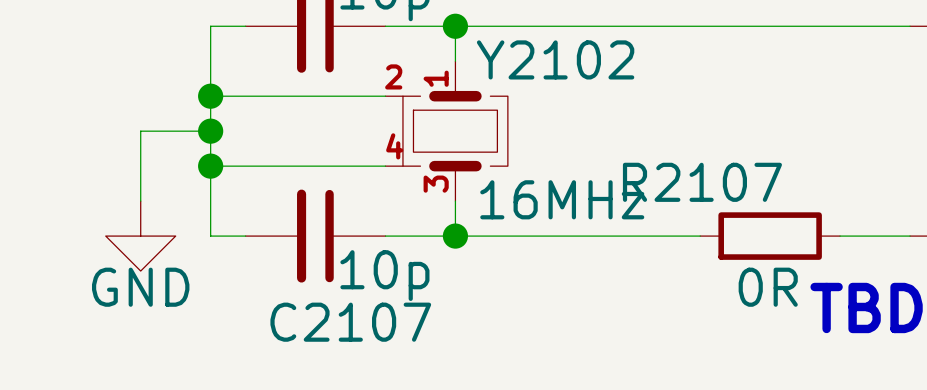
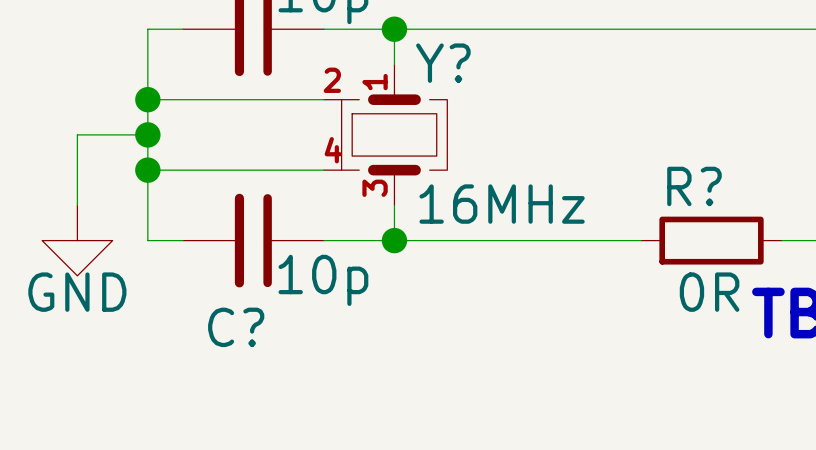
Y2102 name: Y2102 (555, 59) -> Y? (443, 63)
R2107 name: R2107 (702, 182) -> R? (694, 186)
C2107 name: C2107 (350, 322) -> C? (236, 327)

